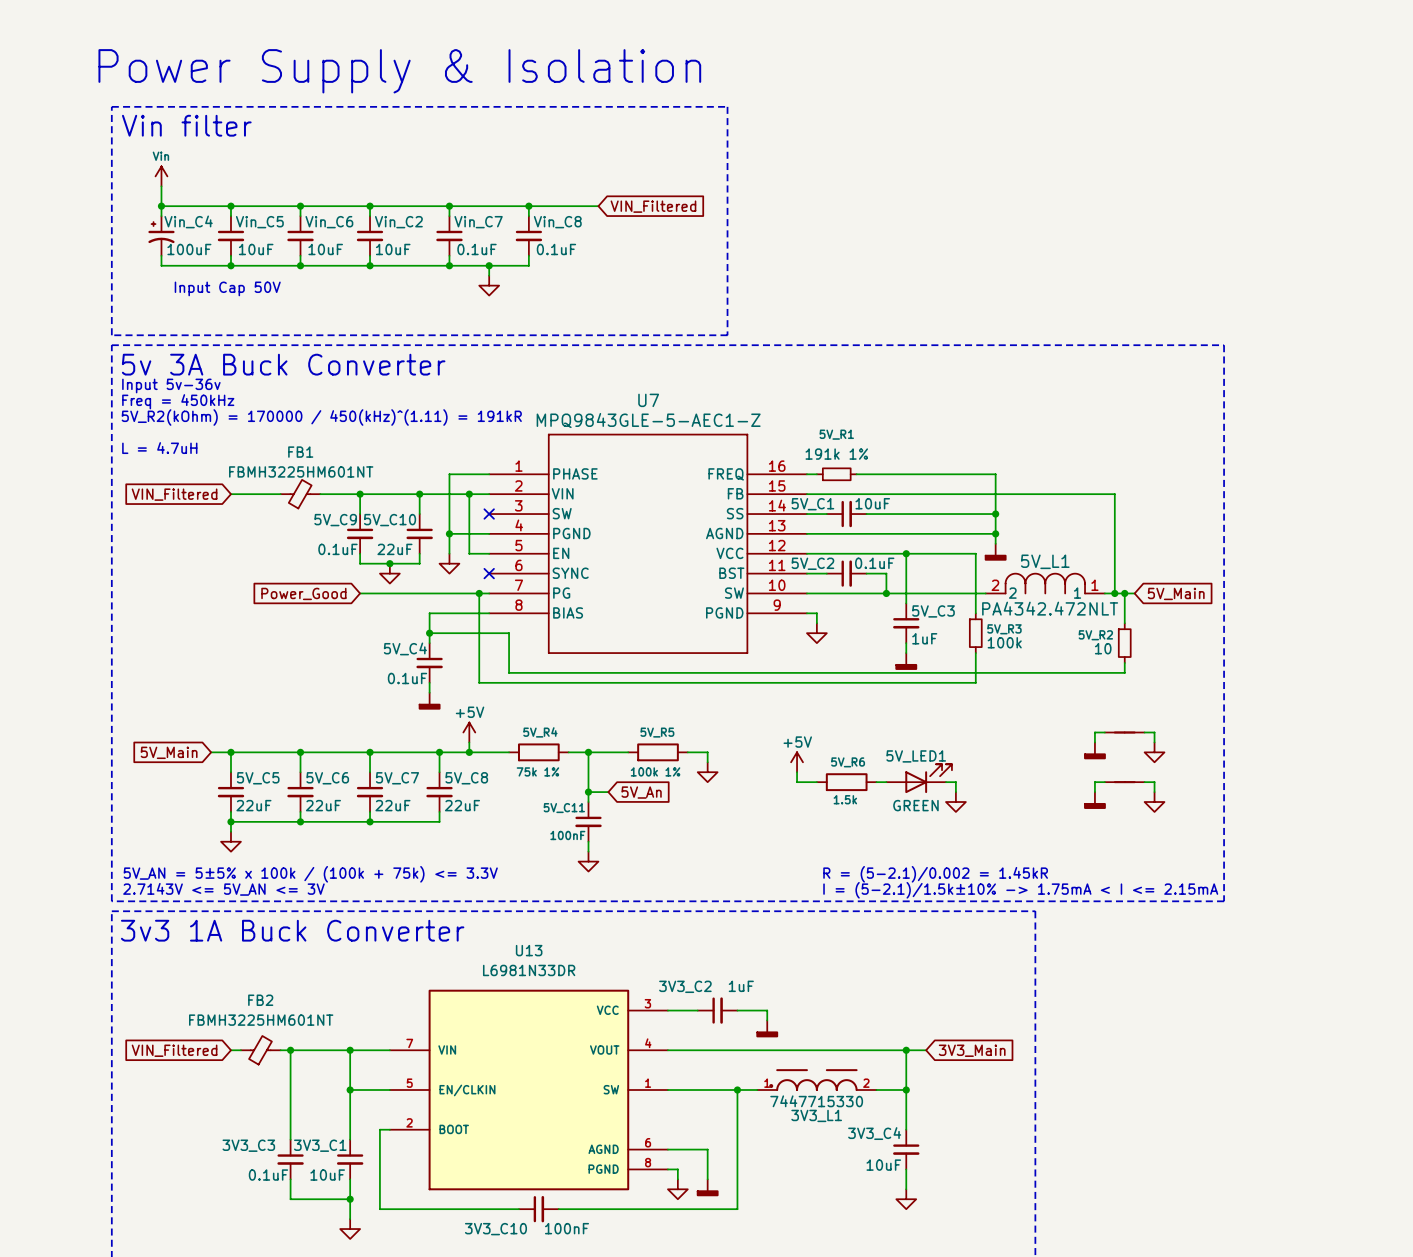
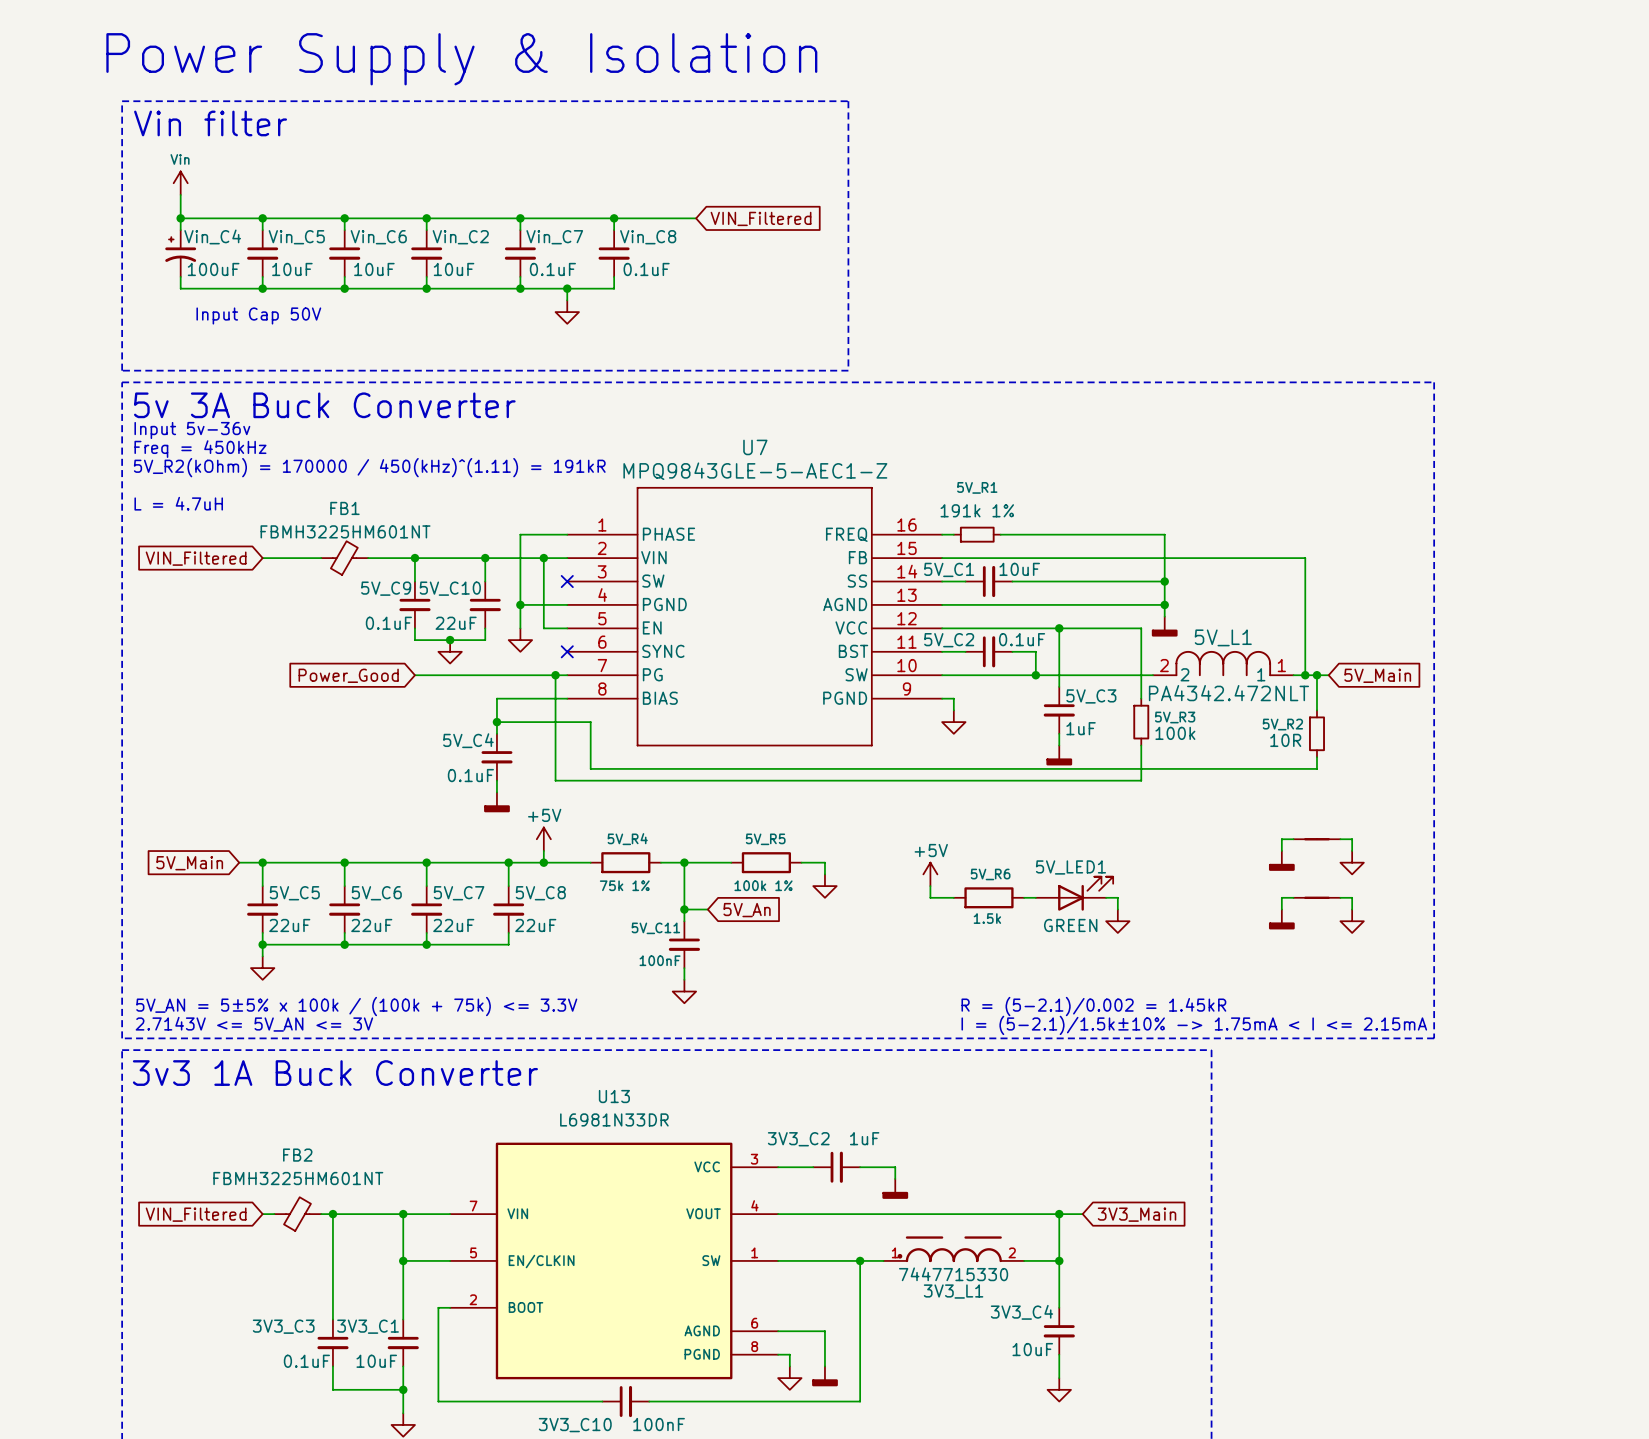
5V_R2 value: 10 (1103, 648) -> 10R (1285, 740)

